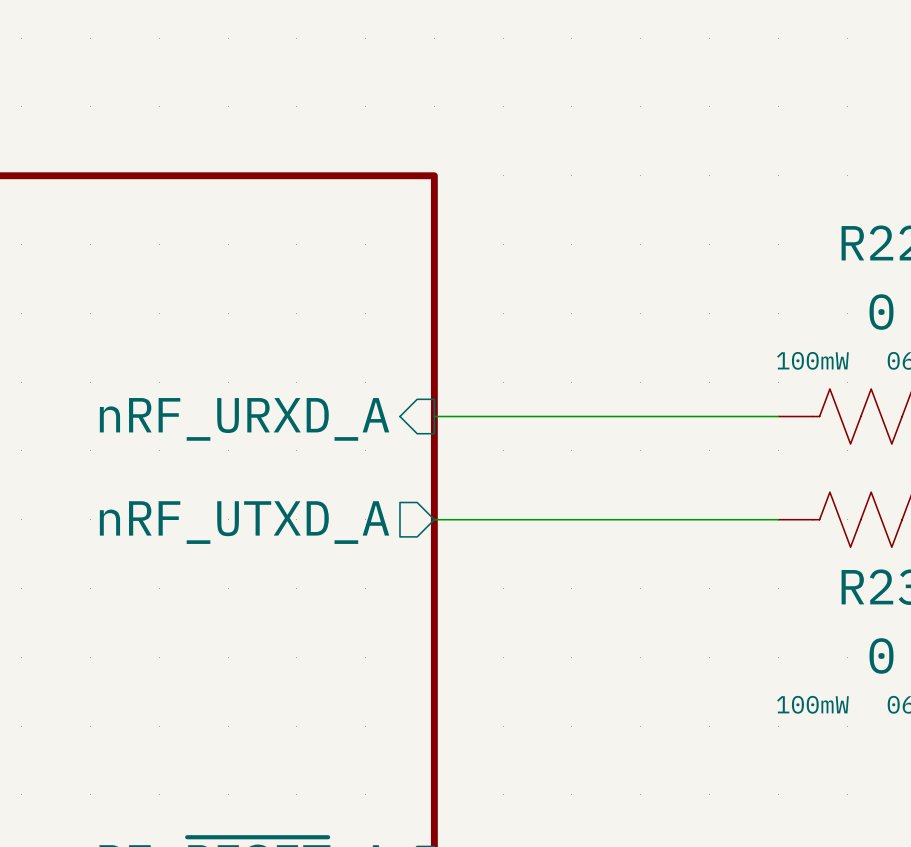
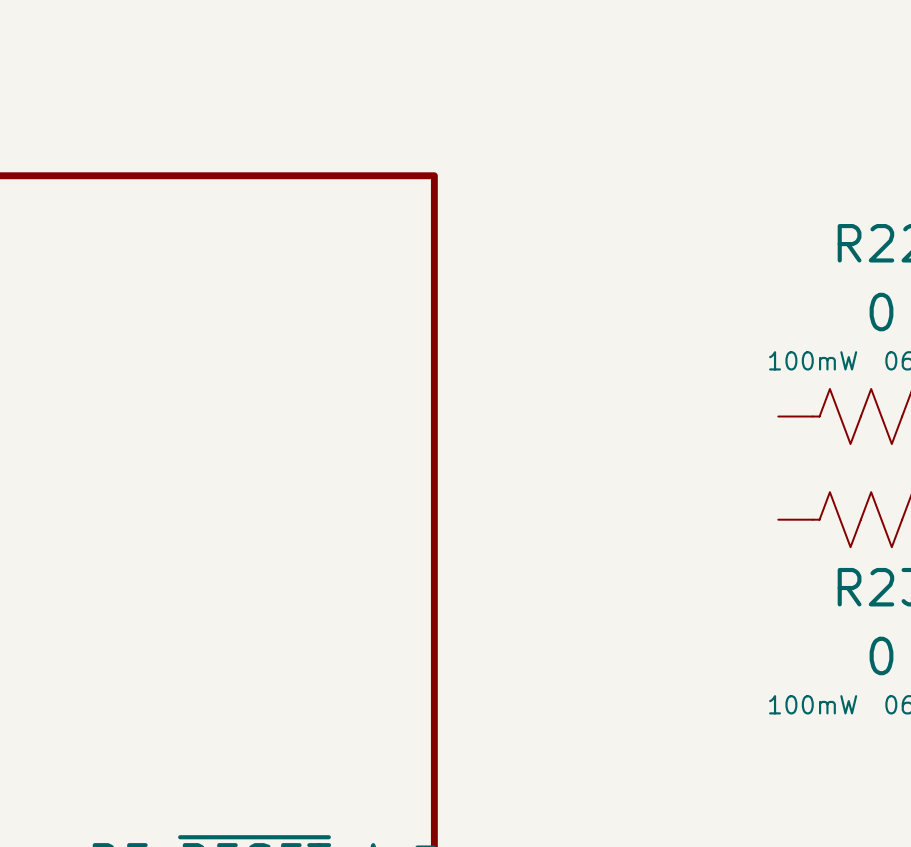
wire: (434, 416) (778, 416) -> none
sheet pin: nRF_URXD_A (244, 419) -> none
wire: (434, 519) (778, 519) -> none
sheet pin: nRF_UTXD_A (244, 522) -> none

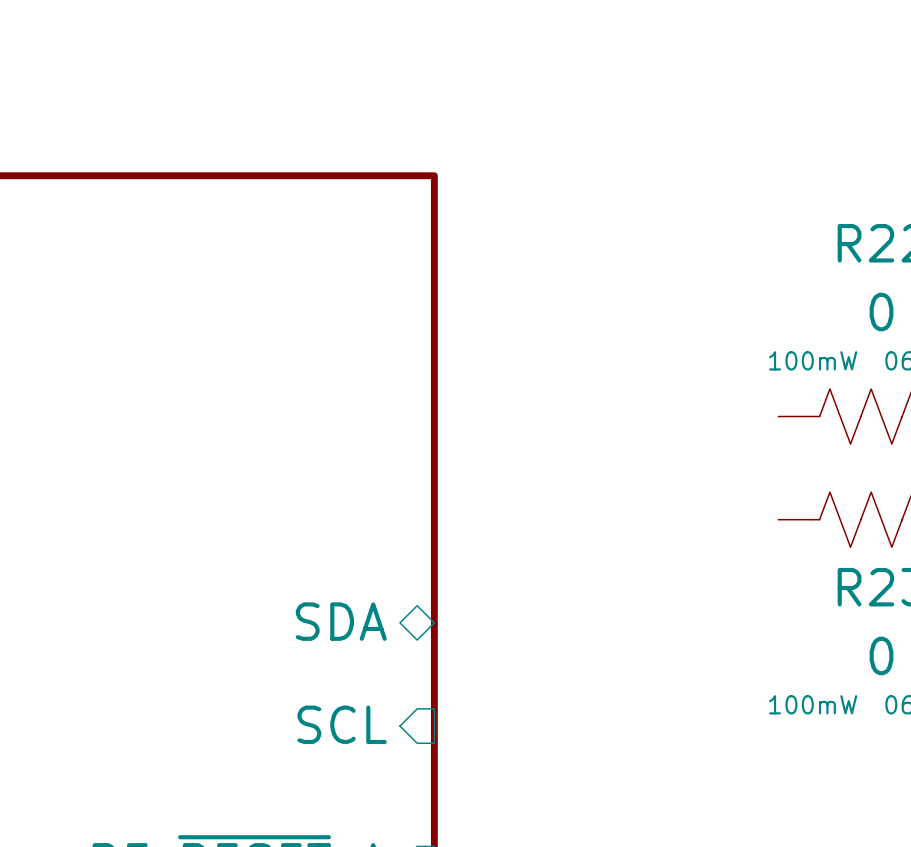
sheet pin: none -> SDA (341, 621)
sheet pin: none -> SCL (342, 724)

